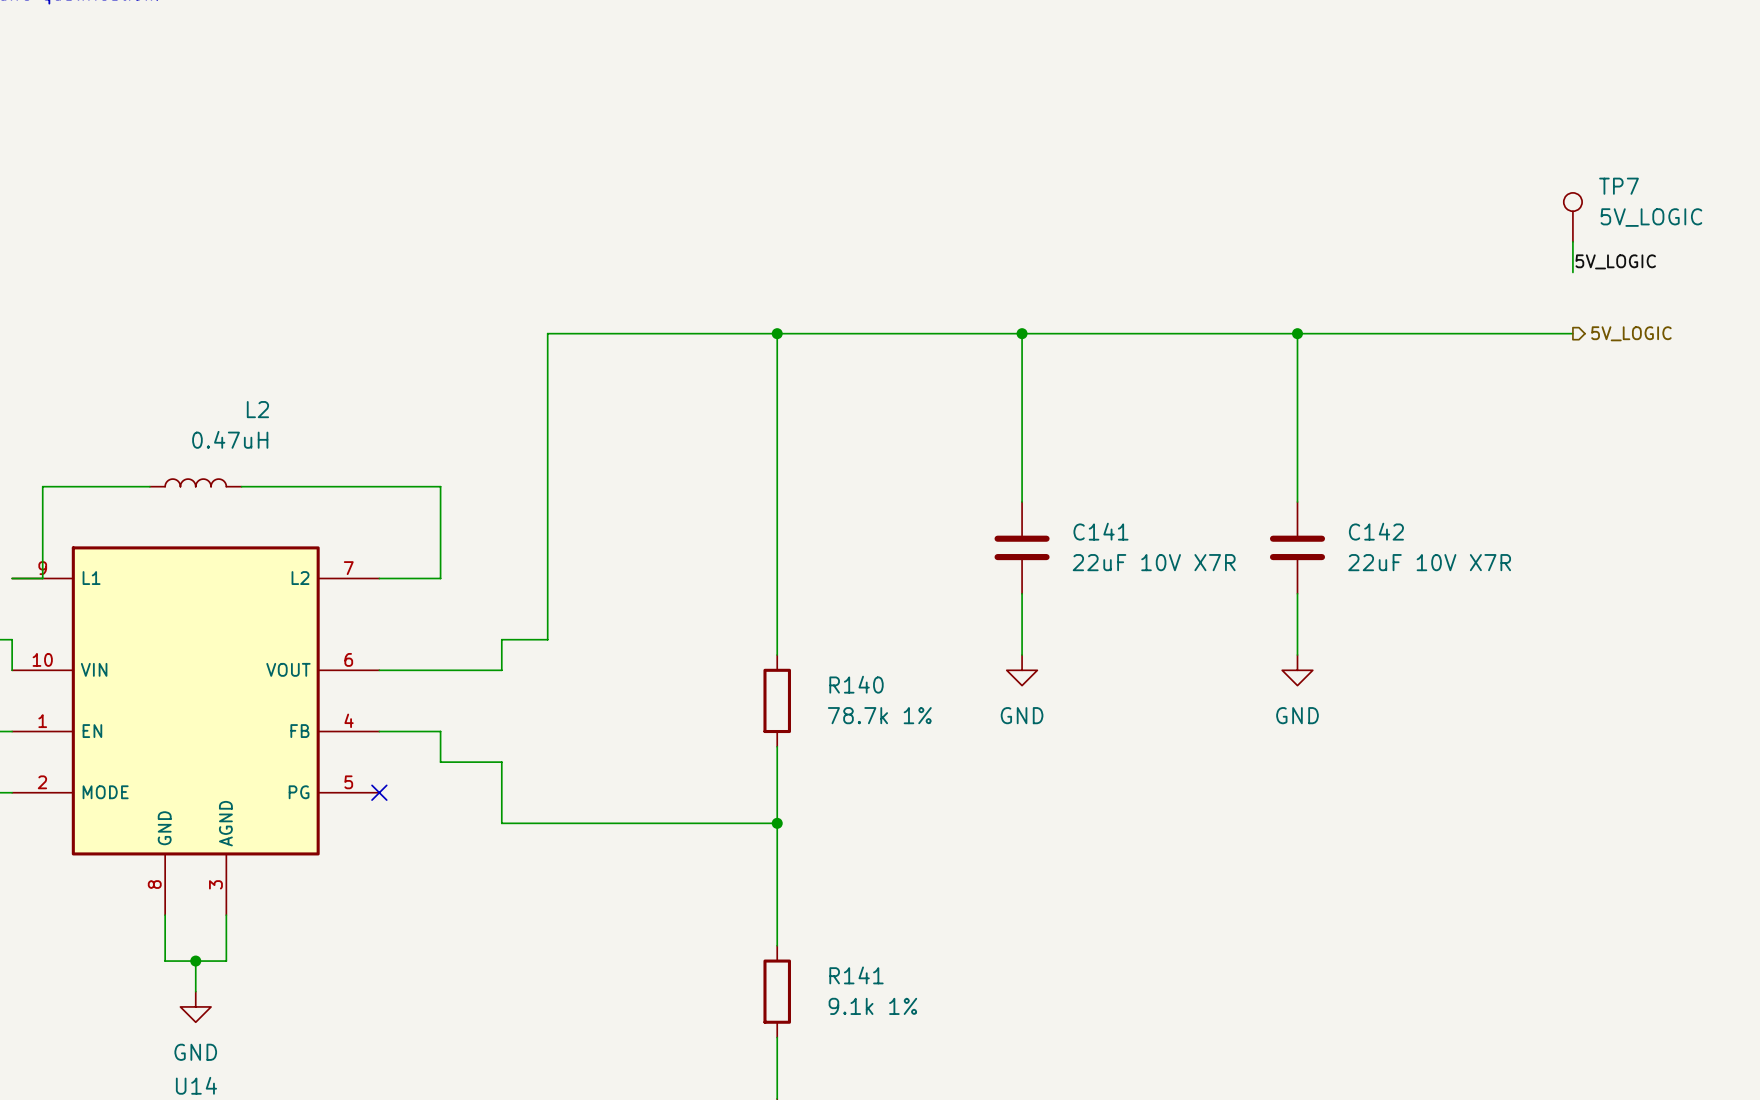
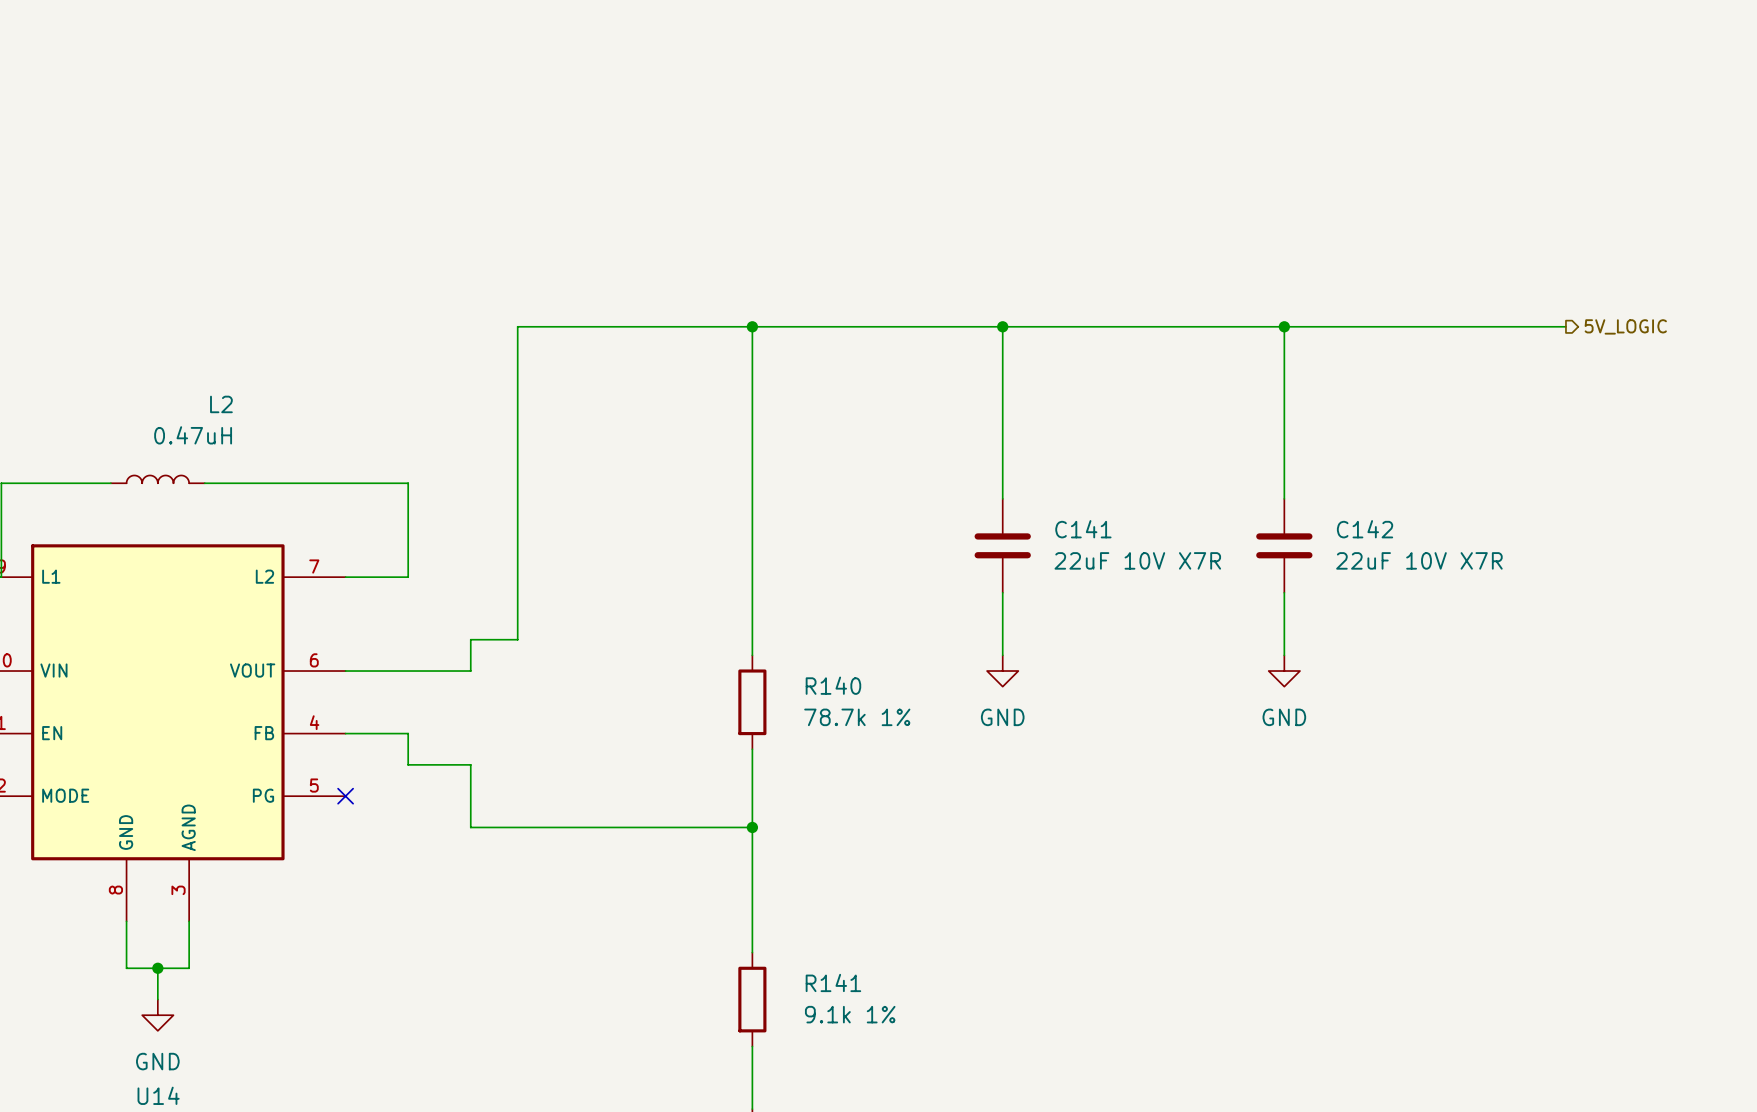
TP7: 5V_LOGIC (1572, 217) -> none
wire: (1572, 241) (1572, 272) -> none
label: 5V_LOGIC (1615, 261) -> none

